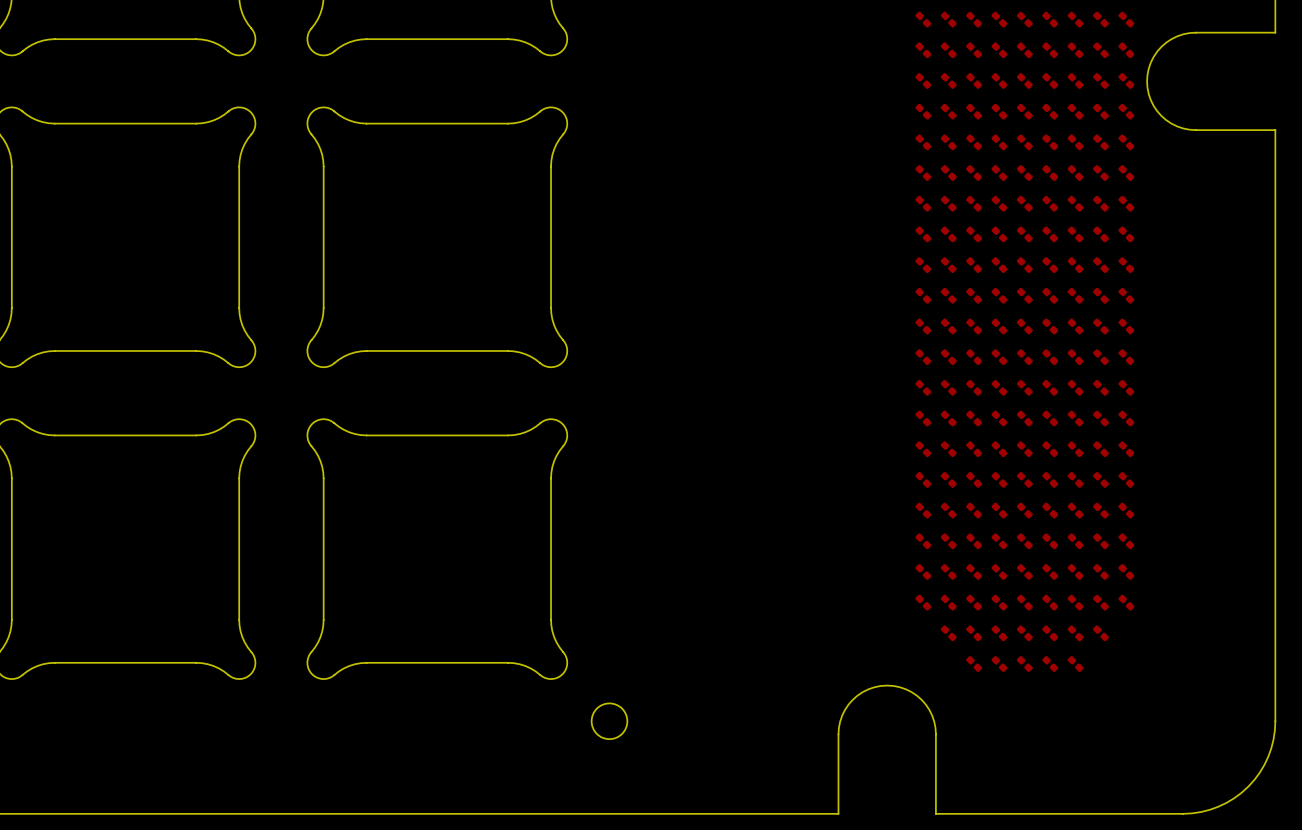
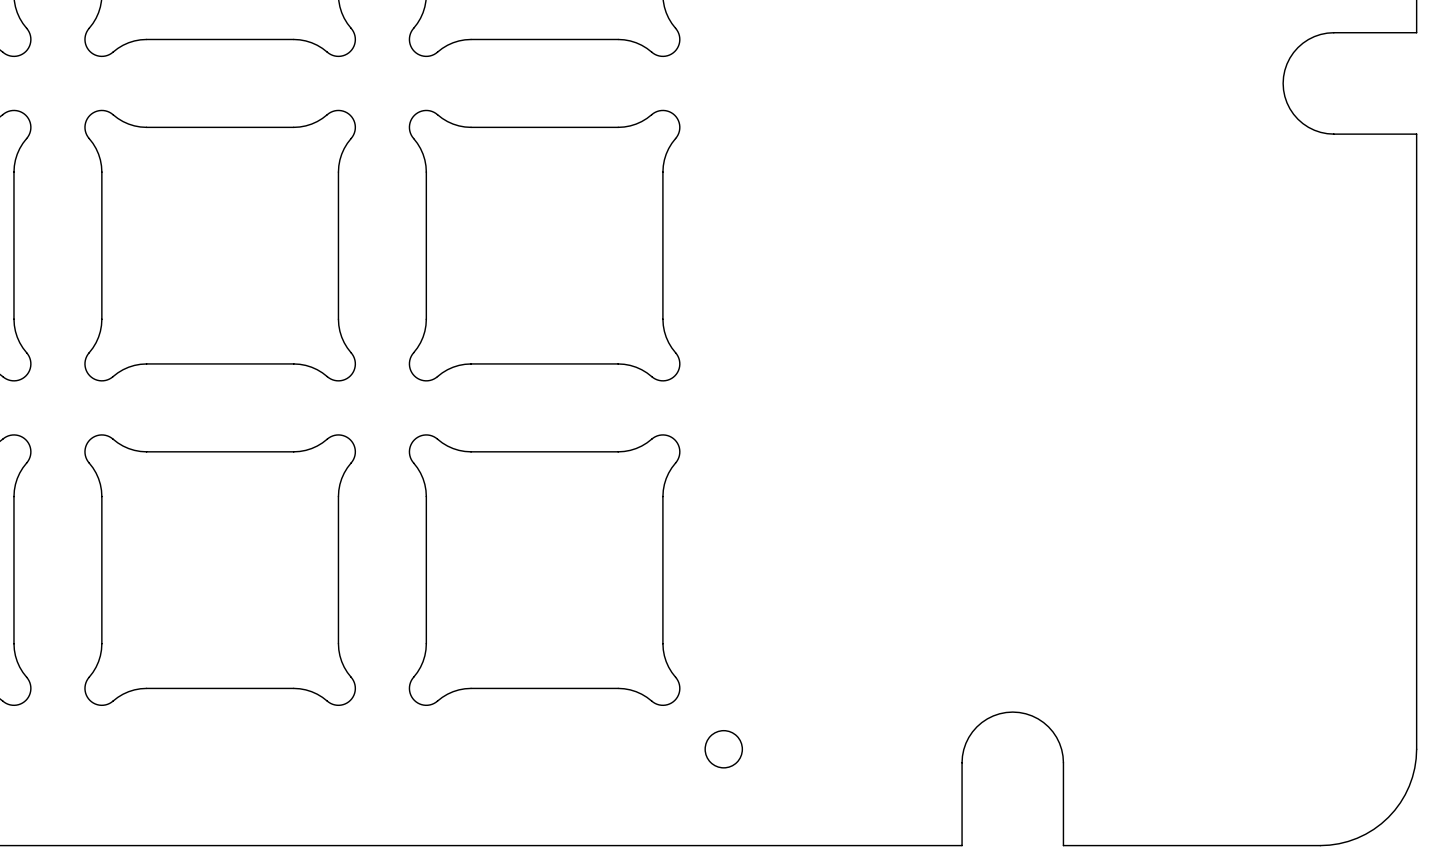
part: (923, 19) -> none
part: (948, 19) -> none
part: (974, 19) -> none
part: (999, 19) -> none
part: (1024, 19) -> none
part: (1050, 19) -> none
part: (1075, 19) -> none
part: (1100, 19) -> none
part: (1126, 19) -> none
part: (923, 50) -> none
part: (948, 50) -> none
part: (974, 50) -> none
part: (999, 50) -> none
part: (1024, 50) -> none
part: (1050, 50) -> none
part: (1075, 50) -> none
part: (1100, 50) -> none
part: (1126, 50) -> none
part: (923, 80) -> none
part: (948, 80) -> none
part: (974, 80) -> none
part: (999, 80) -> none
part: (1024, 80) -> none
part: (1050, 80) -> none
part: (1075, 80) -> none
part: (1100, 80) -> none
part: (1126, 80) -> none
part: (923, 111) -> none
part: (948, 111) -> none
part: (974, 111) -> none
part: (999, 111) -> none
part: (1024, 111) -> none
part: (1050, 111) -> none
part: (1075, 111) -> none
part: (1100, 111) -> none
part: (1126, 111) -> none
part: (923, 142) -> none
part: (948, 142) -> none
part: (974, 142) -> none
part: (999, 142) -> none
part: (1024, 142) -> none
part: (1050, 142) -> none
part: (1075, 142) -> none
part: (1100, 142) -> none
part: (1126, 142) -> none
part: (923, 173) -> none
part: (948, 173) -> none
part: (974, 173) -> none
part: (999, 173) -> none
part: (1024, 173) -> none
part: (1050, 173) -> none
part: (1075, 173) -> none
part: (1100, 173) -> none
part: (1126, 173) -> none
part: (923, 203) -> none
part: (948, 203) -> none
part: (974, 203) -> none
part: (999, 203) -> none
part: (1024, 203) -> none
part: (1050, 203) -> none
part: (1075, 203) -> none
part: (1100, 203) -> none
part: (1126, 203) -> none
part: (923, 234) -> none
part: (948, 234) -> none
part: (974, 234) -> none
part: (999, 234) -> none
part: (1024, 234) -> none
part: (1050, 234) -> none
part: (1075, 234) -> none
part: (1100, 234) -> none
part: (1126, 234) -> none
part: (923, 265) -> none
part: (948, 265) -> none
part: (974, 265) -> none
part: (999, 265) -> none
part: (1024, 265) -> none
part: (1050, 265) -> none
part: (1075, 265) -> none
part: (1100, 265) -> none
part: (1126, 265) -> none
part: (923, 295) -> none
part: (948, 295) -> none
part: (974, 295) -> none
part: (999, 295) -> none
part: (1024, 295) -> none
part: (1050, 295) -> none
part: (1075, 295) -> none
part: (1100, 295) -> none
part: (1126, 295) -> none
part: (923, 326) -> none
part: (948, 326) -> none
part: (974, 326) -> none
part: (999, 326) -> none
part: (1024, 326) -> none
part: (1050, 326) -> none
part: (1075, 326) -> none
part: (1100, 326) -> none
part: (1126, 326) -> none
part: (923, 357) -> none
part: (948, 357) -> none
part: (974, 357) -> none
part: (999, 357) -> none
part: (1024, 357) -> none
part: (1050, 357) -> none
part: (1075, 357) -> none
part: (1100, 357) -> none
part: (1126, 357) -> none
part: (923, 387) -> none
part: (948, 387) -> none
part: (974, 387) -> none
part: (999, 387) -> none
part: (1024, 387) -> none
part: (1050, 387) -> none
part: (1075, 387) -> none
part: (1100, 387) -> none
part: (1126, 387) -> none
part: (923, 418) -> none
part: (948, 418) -> none
part: (974, 418) -> none
part: (999, 418) -> none
part: (1024, 418) -> none
part: (1050, 418) -> none
part: (1075, 418) -> none
part: (1100, 418) -> none
part: (1126, 418) -> none
part: (923, 449) -> none
part: (948, 449) -> none
part: (974, 449) -> none
part: (999, 449) -> none
part: (1024, 449) -> none
part: (1050, 449) -> none
part: (1075, 449) -> none
part: (1100, 449) -> none
part: (1126, 449) -> none
part: (923, 479) -> none
part: (948, 479) -> none
part: (974, 479) -> none
part: (999, 479) -> none
part: (1024, 479) -> none
part: (1050, 479) -> none
part: (1075, 479) -> none
part: (1100, 479) -> none
part: (1126, 479) -> none
part: (923, 510) -> none
part: (948, 510) -> none
part: (974, 510) -> none
part: (999, 510) -> none
part: (1024, 510) -> none
part: (1050, 510) -> none
part: (1075, 510) -> none
part: (1100, 510) -> none
part: (1126, 510) -> none
part: (923, 541) -> none
part: (948, 541) -> none
part: (974, 541) -> none
part: (999, 541) -> none
part: (1024, 541) -> none
part: (1050, 541) -> none
part: (1075, 541) -> none
part: (1100, 541) -> none
part: (1126, 541) -> none
part: (923, 571) -> none
part: (948, 571) -> none
part: (974, 571) -> none
part: (999, 571) -> none
part: (1024, 571) -> none
part: (1050, 571) -> none
part: (1075, 571) -> none
part: (1100, 571) -> none
part: (1126, 571) -> none
part: (923, 602) -> none
part: (948, 602) -> none
part: (974, 602) -> none
part: (999, 602) -> none
part: (1024, 602) -> none
part: (1050, 602) -> none
part: (1075, 602) -> none
part: (1100, 602) -> none
part: (1126, 602) -> none
part: (948, 633) -> none
part: (974, 633) -> none
part: (999, 633) -> none
part: (1024, 633) -> none
part: (1050, 633) -> none
part: (1075, 633) -> none
part: (1100, 633) -> none
part: (974, 664) -> none
part: (999, 664) -> none
part: (1024, 664) -> none
part: (1050, 664) -> none
part: (1075, 664) -> none

